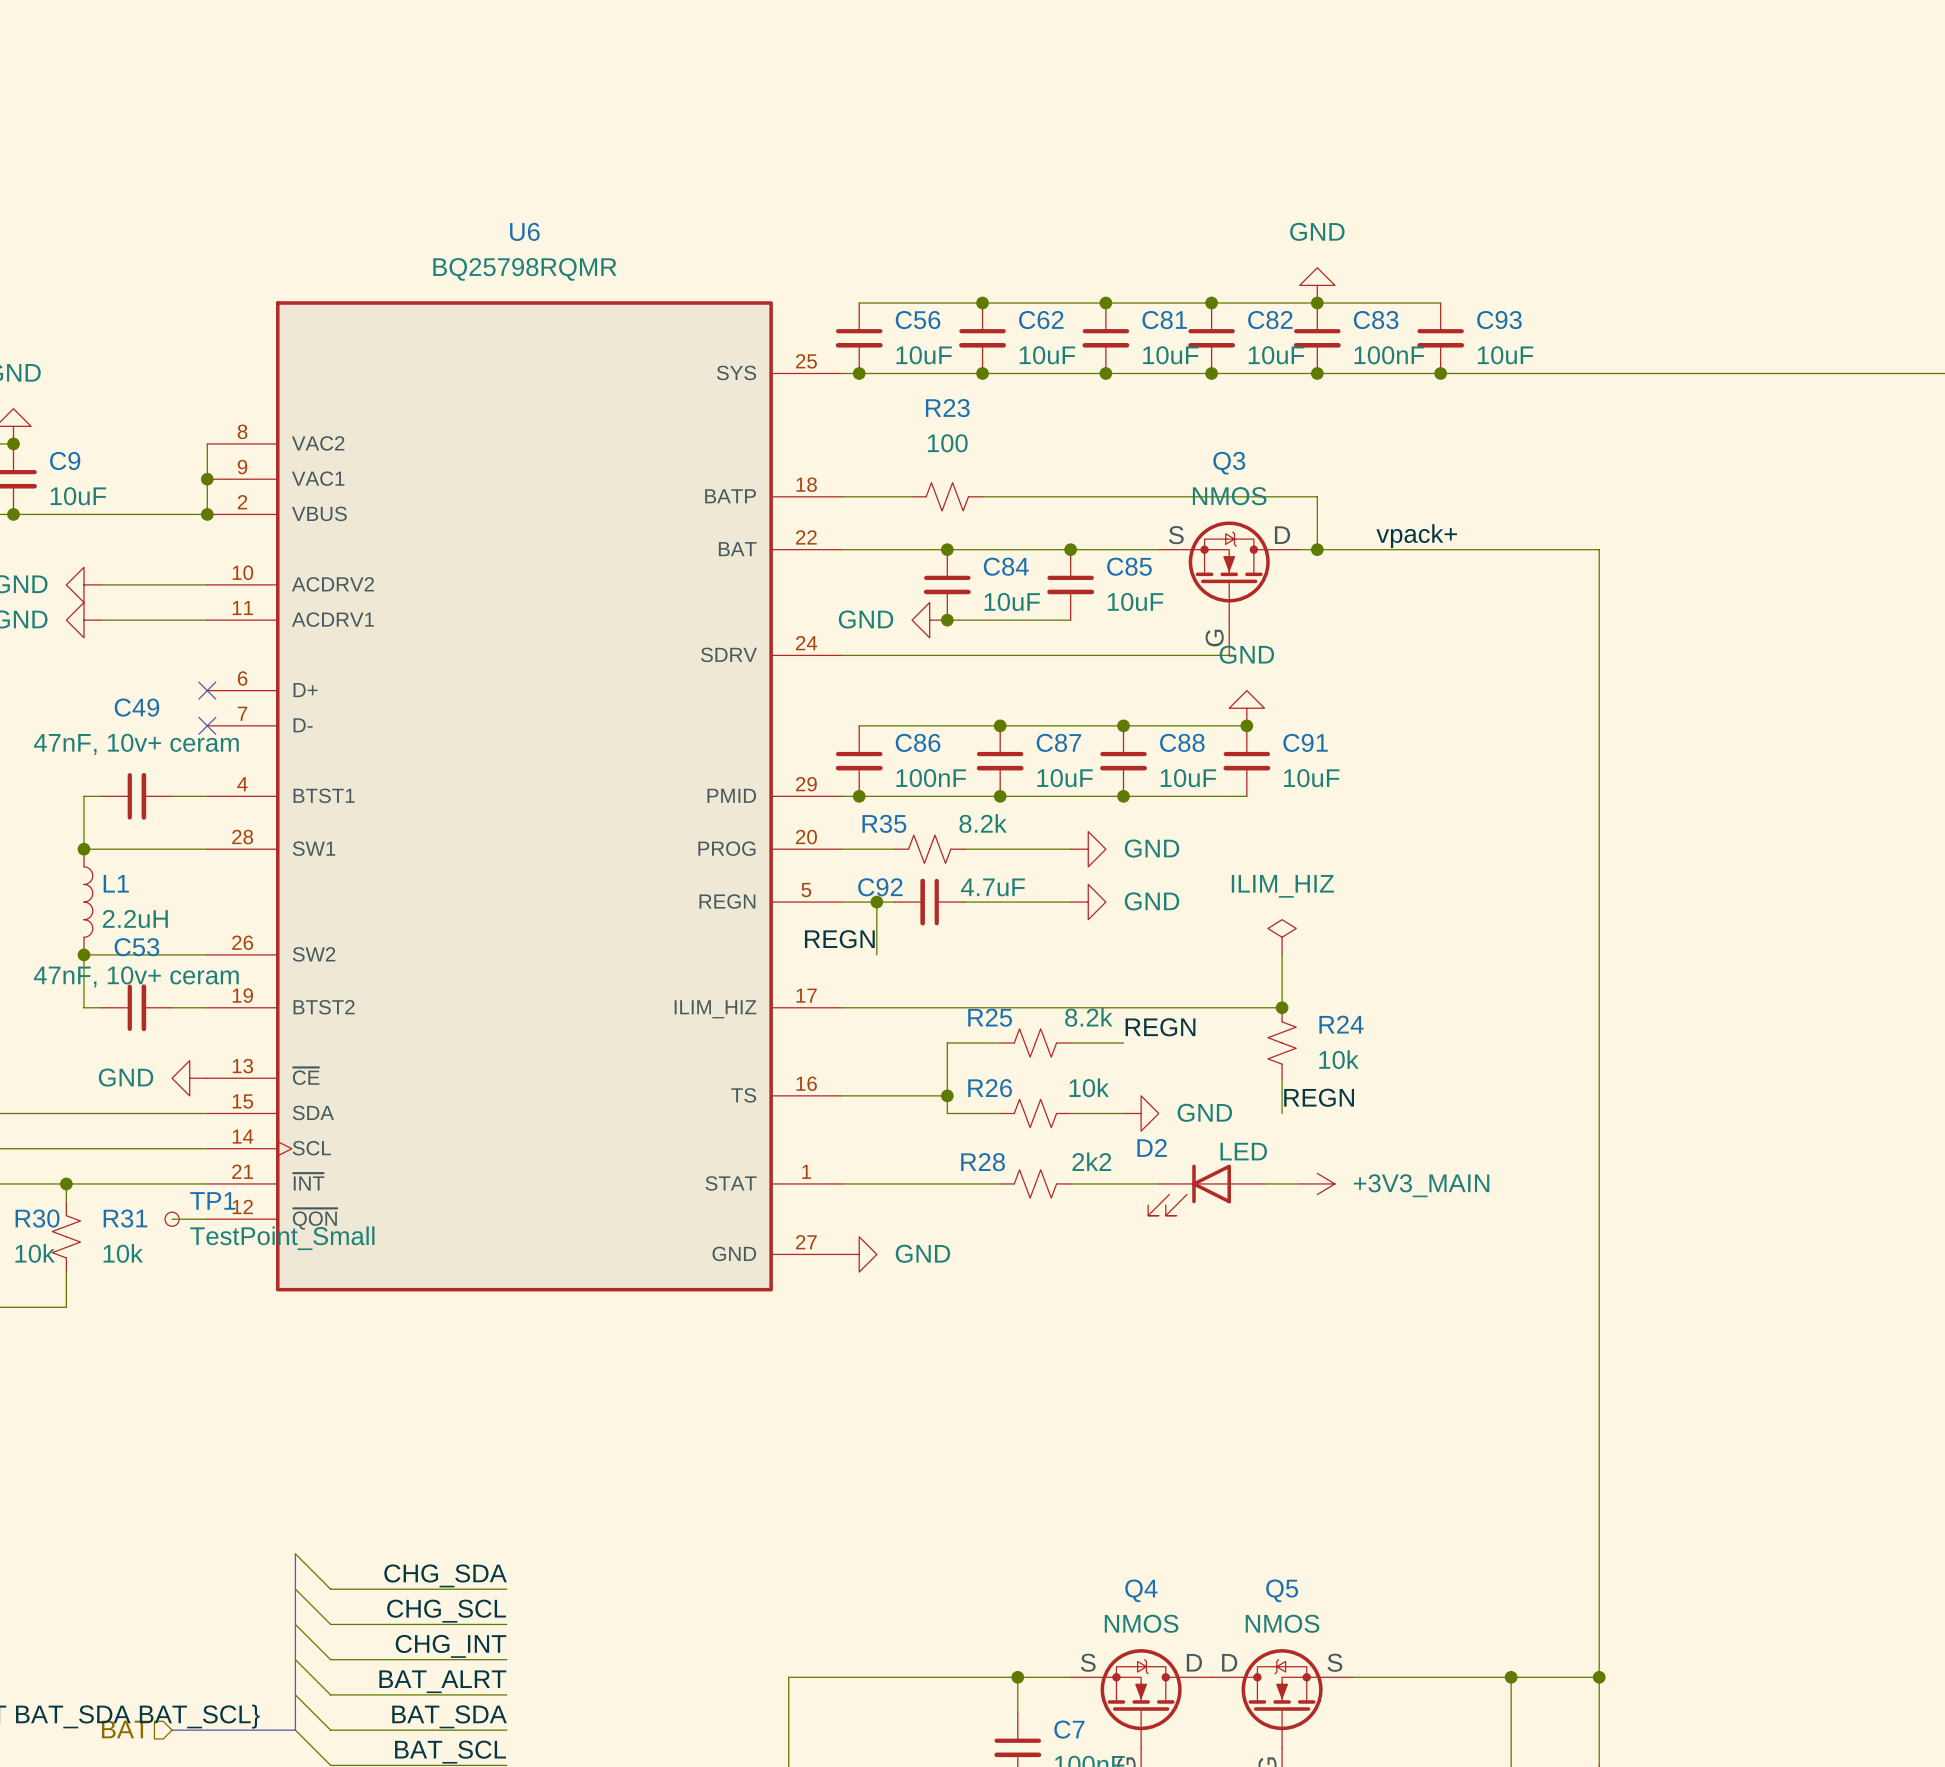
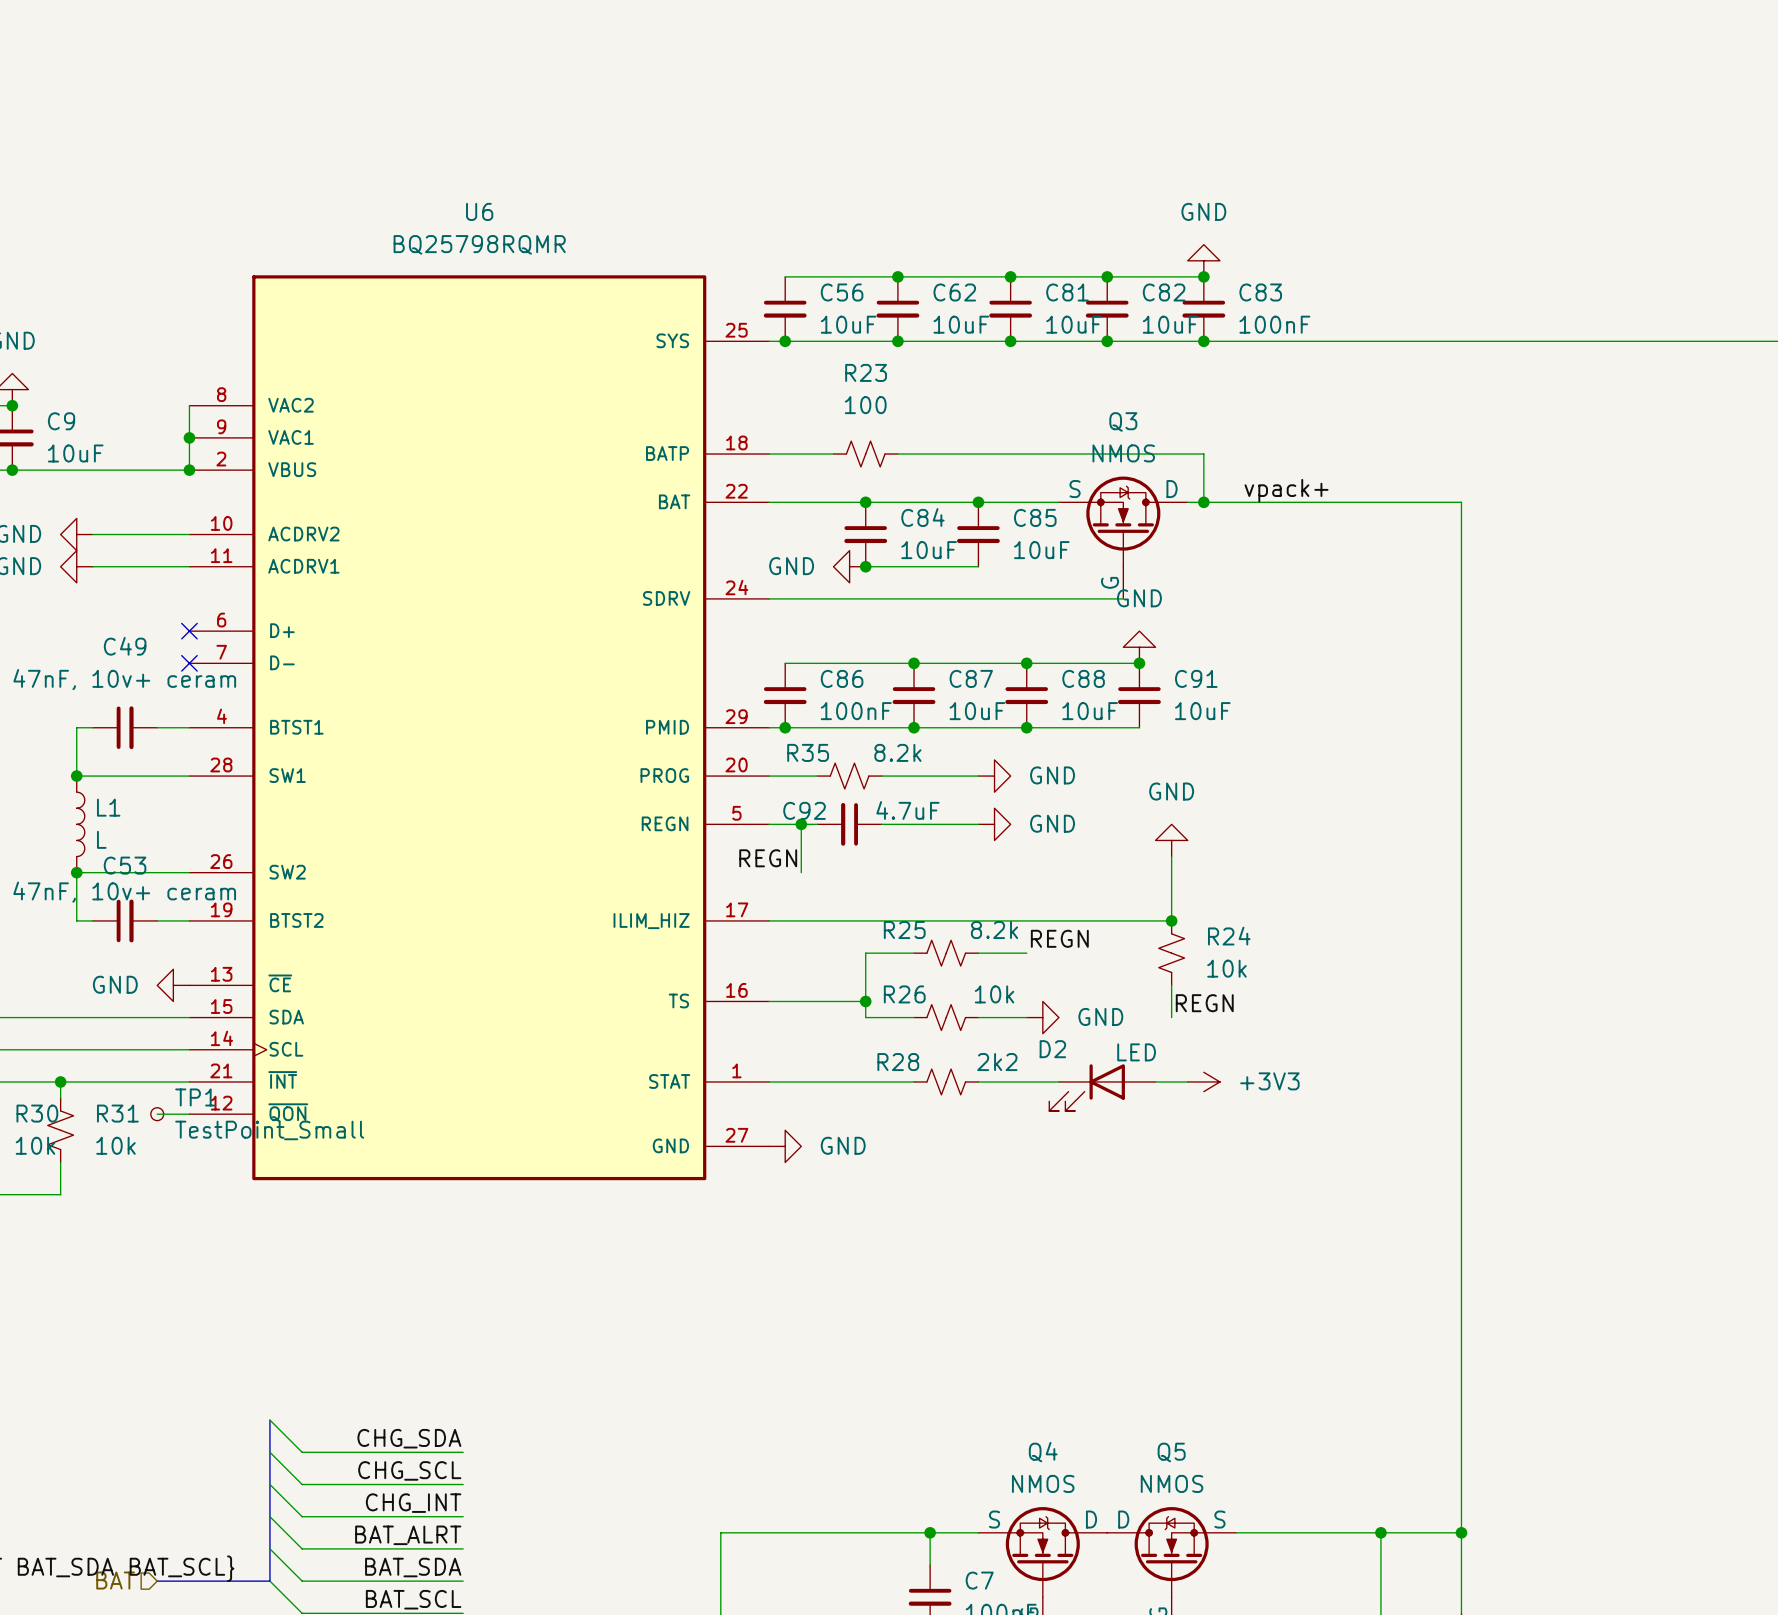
wire: (1317, 303) (1440, 303) -> none
C93: 10uF (1440, 338) -> none
junction: (1440, 373) -> none
L1 value: 2.2uH (135, 919) -> L (101, 839)
power symbol: none -> GND (1171, 840)
power symbol: ILIM_HIZ (1282, 937) -> none
power symbol: +3V3_MAIN (1317, 1183) -> +3V3 (1203, 1081)

